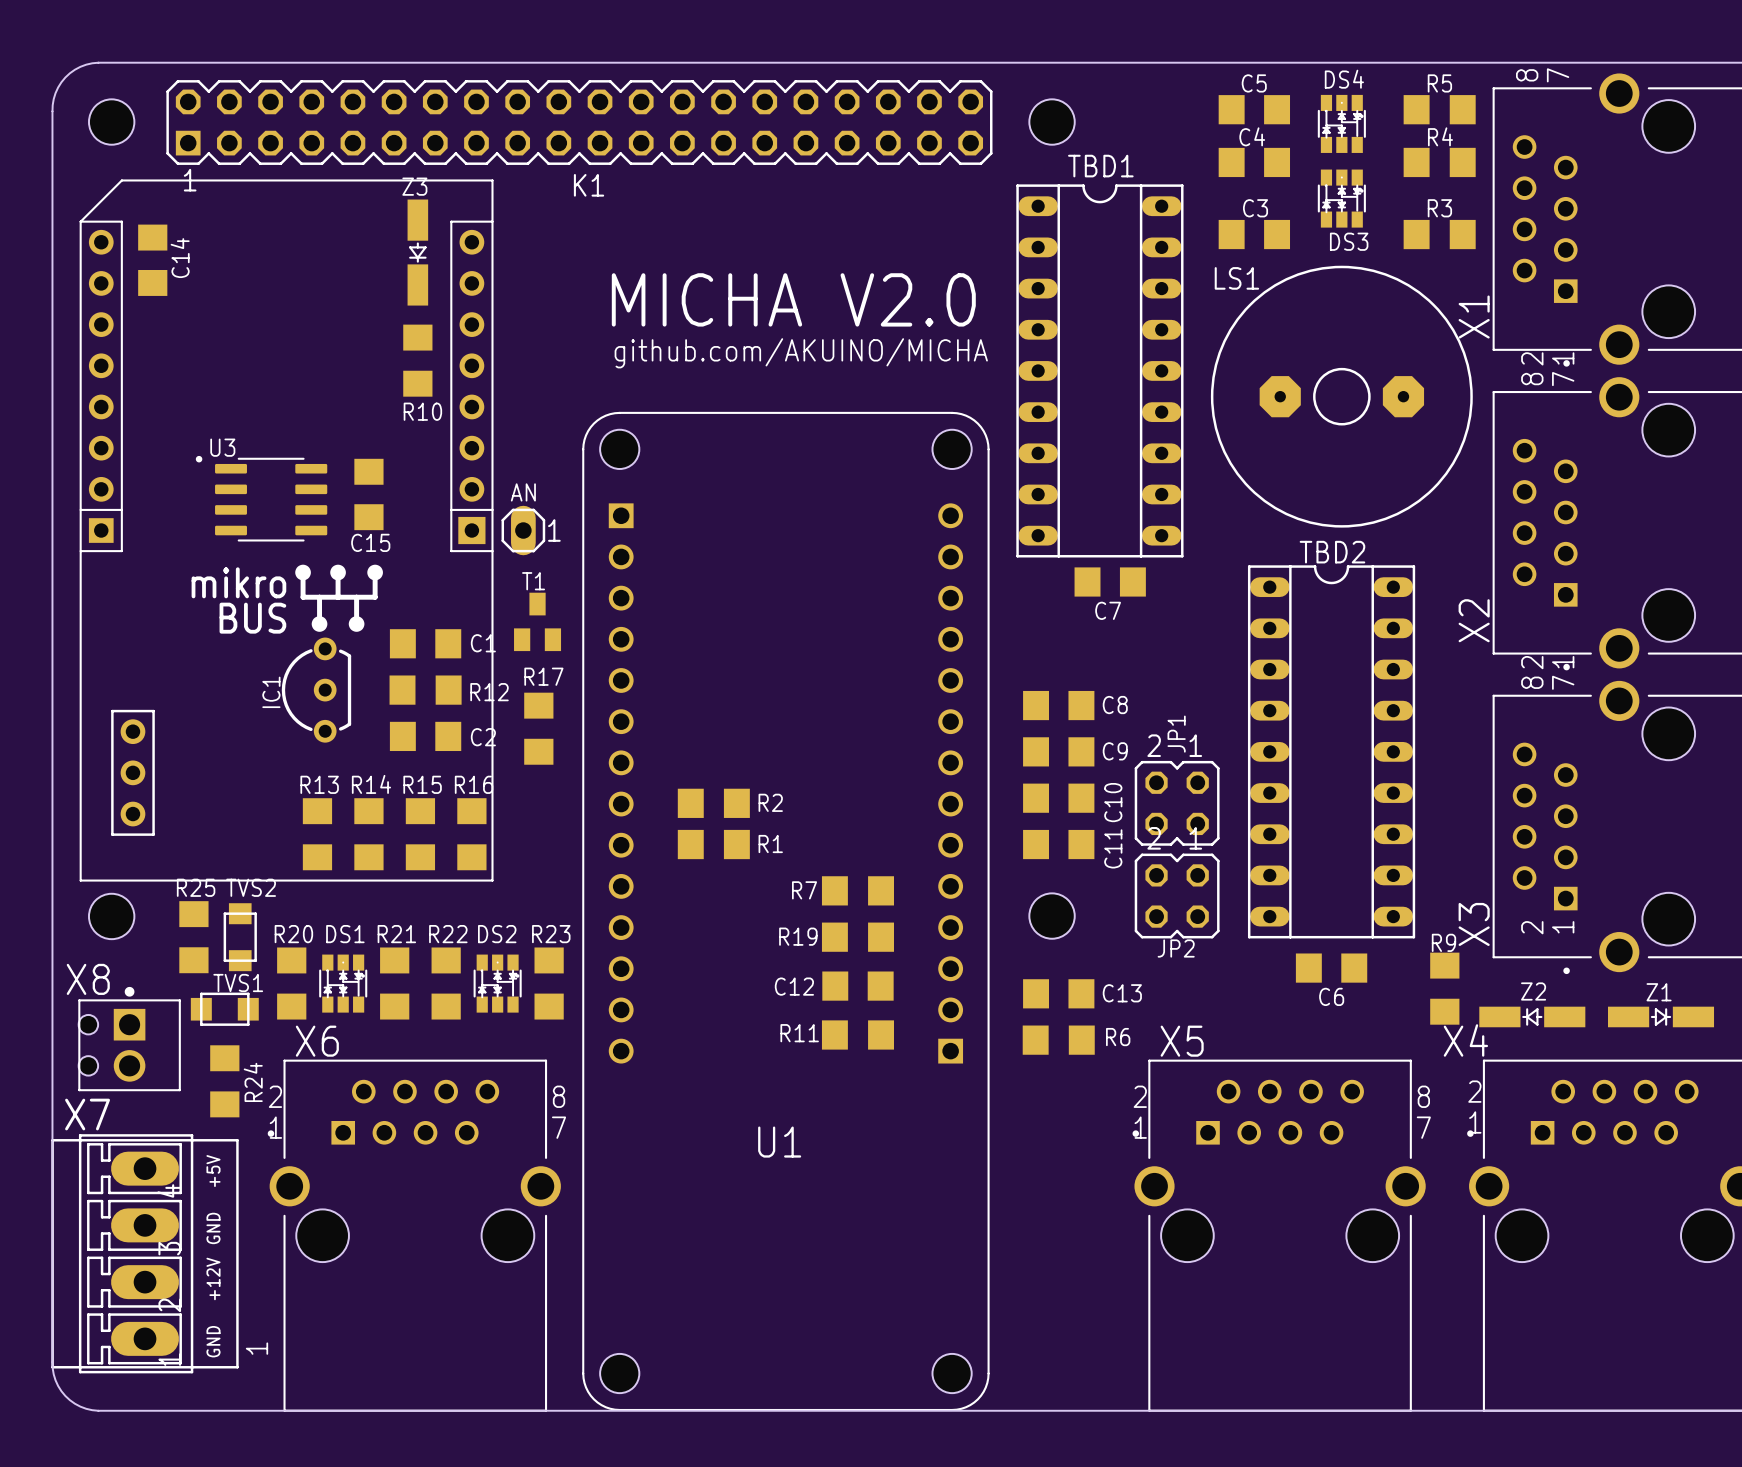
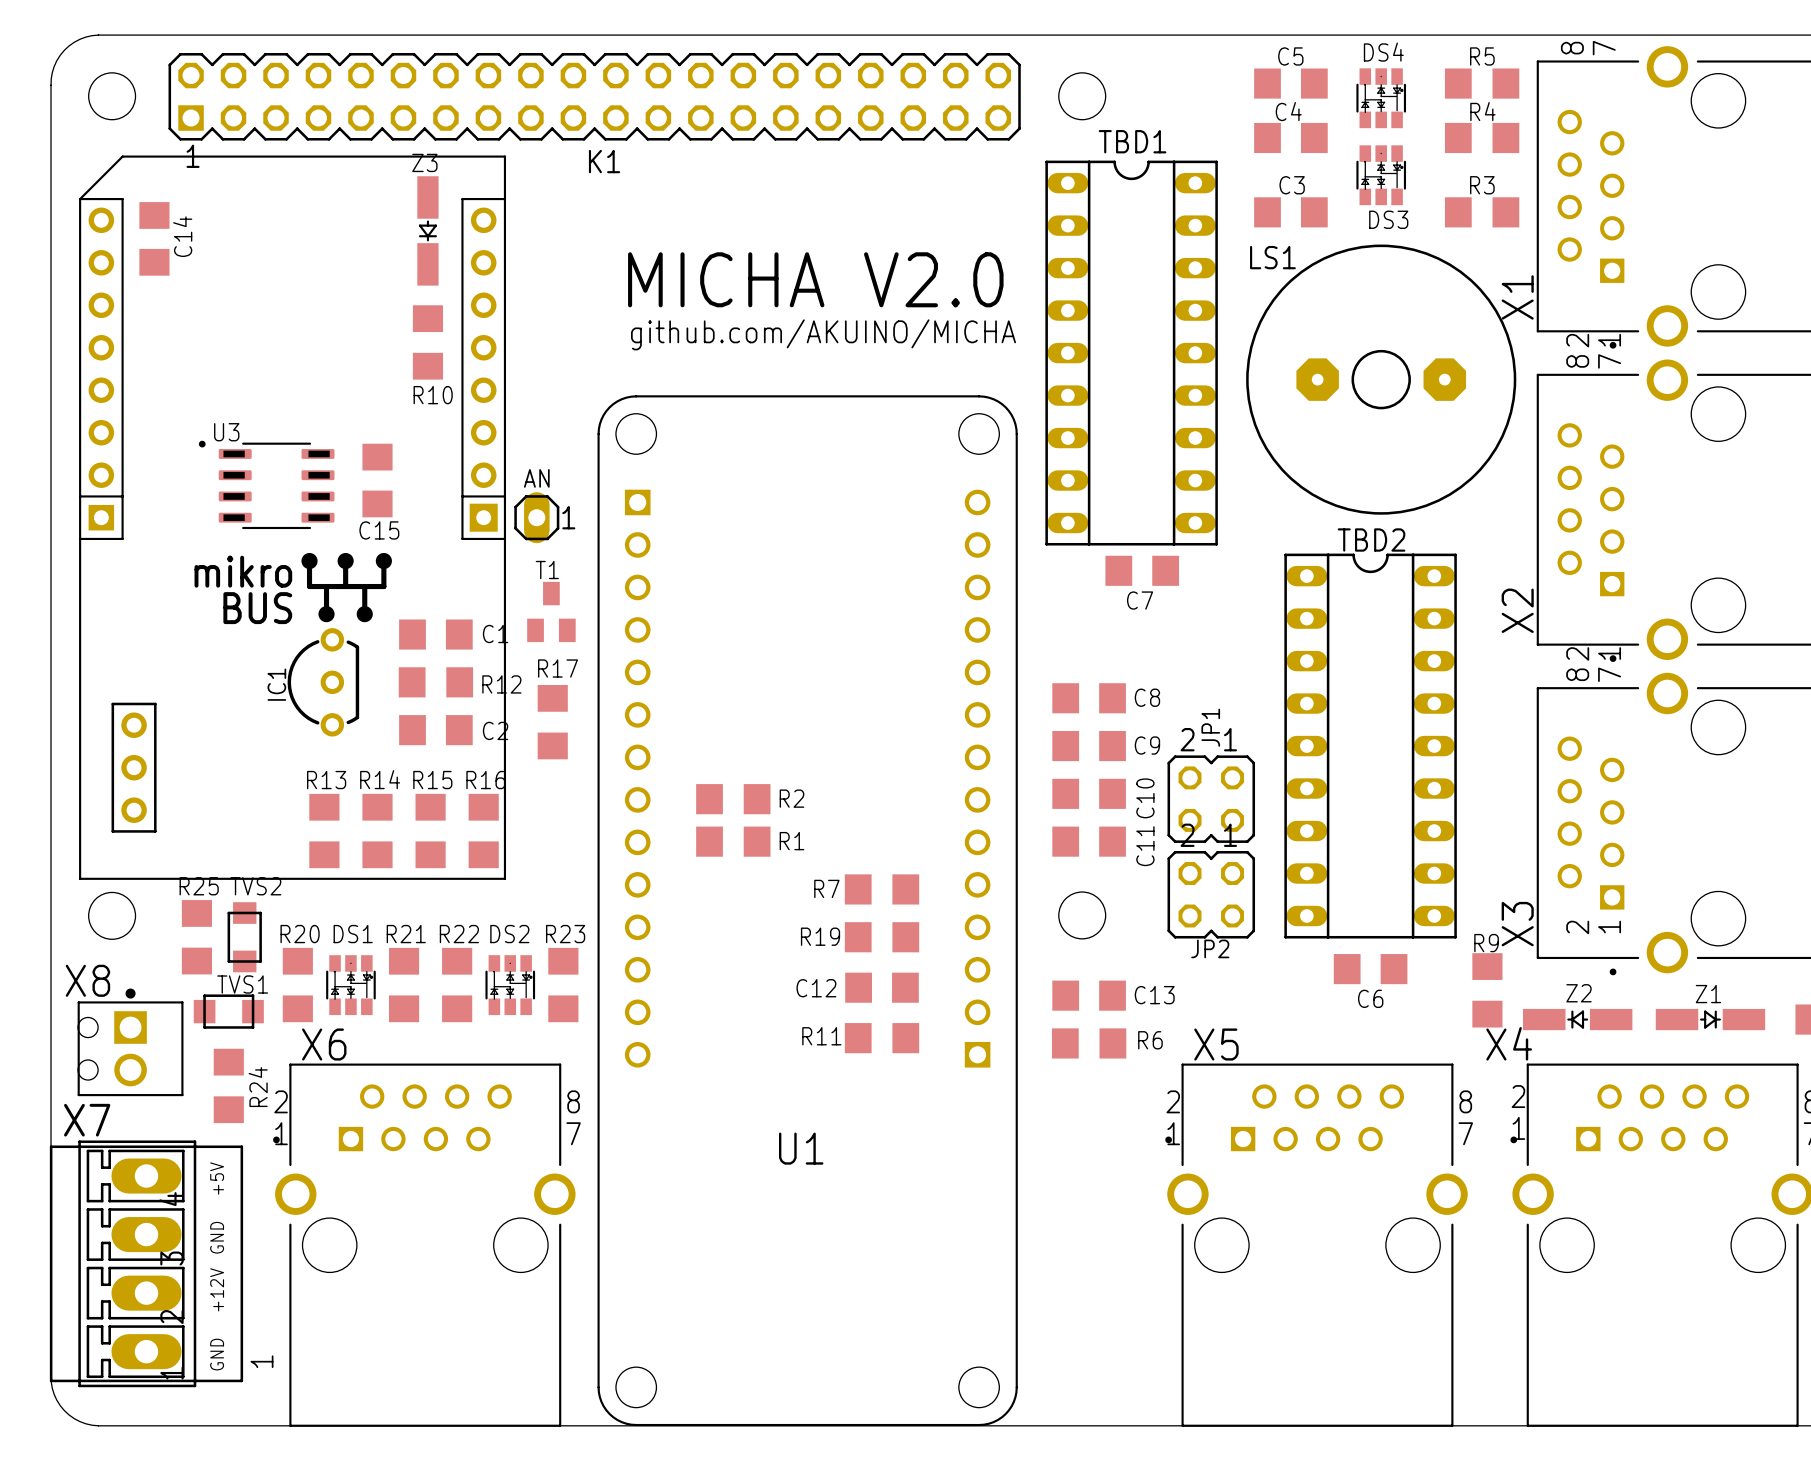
U3 footprint: [195, 455, 328, 542] -> [198, 440, 335, 530]

